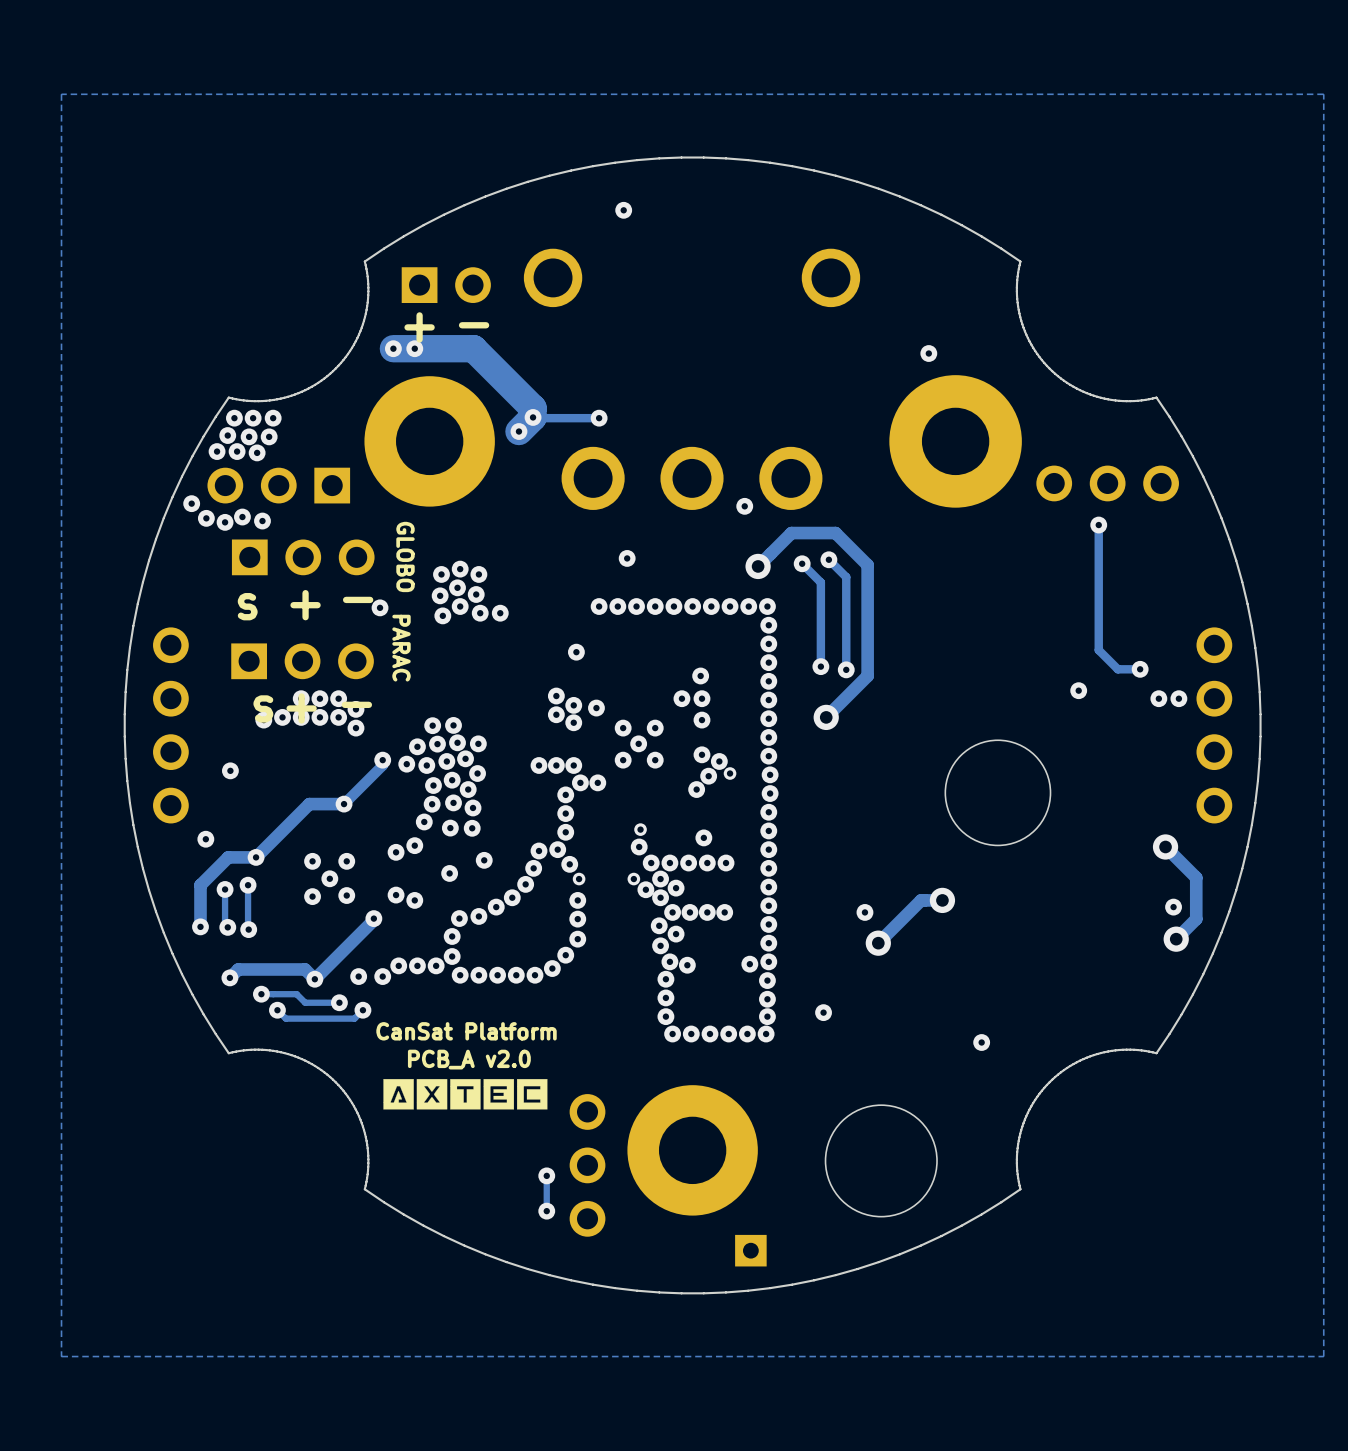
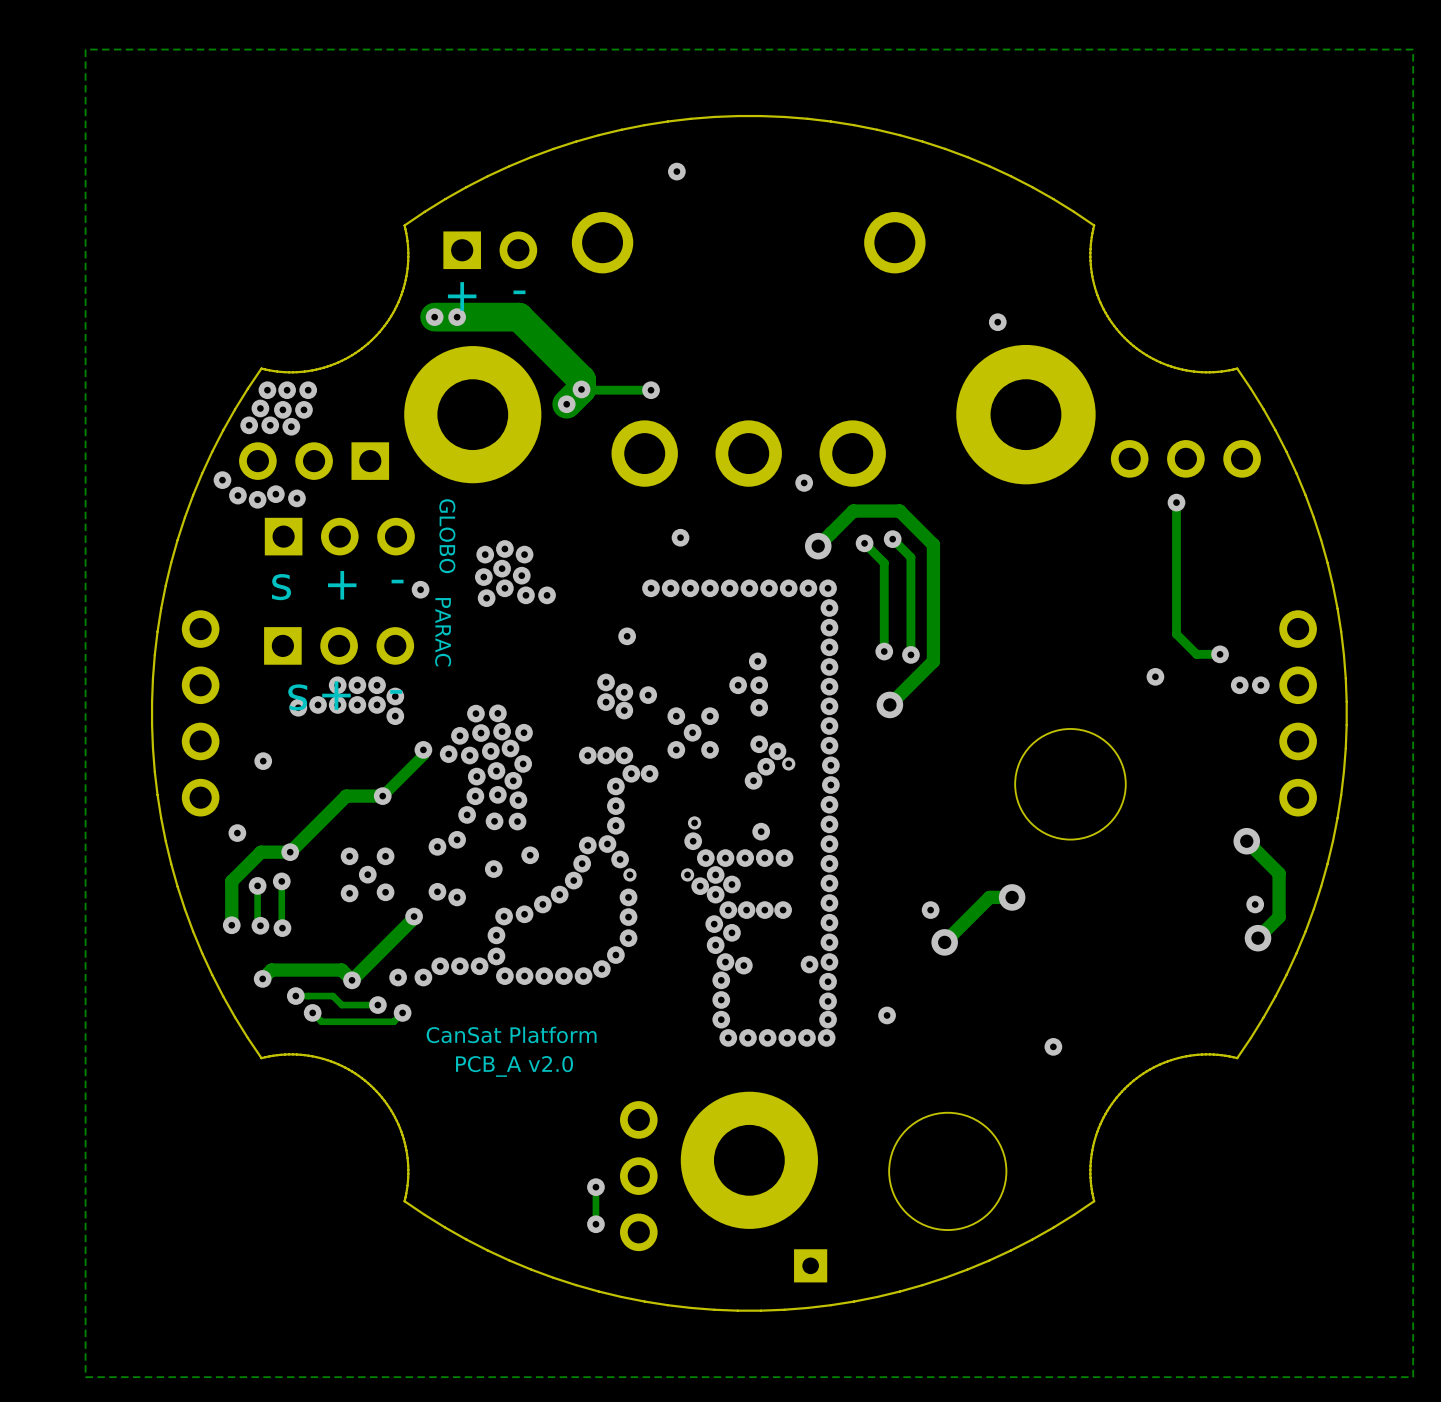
drawing: [383, 1079, 548, 1110] -> none

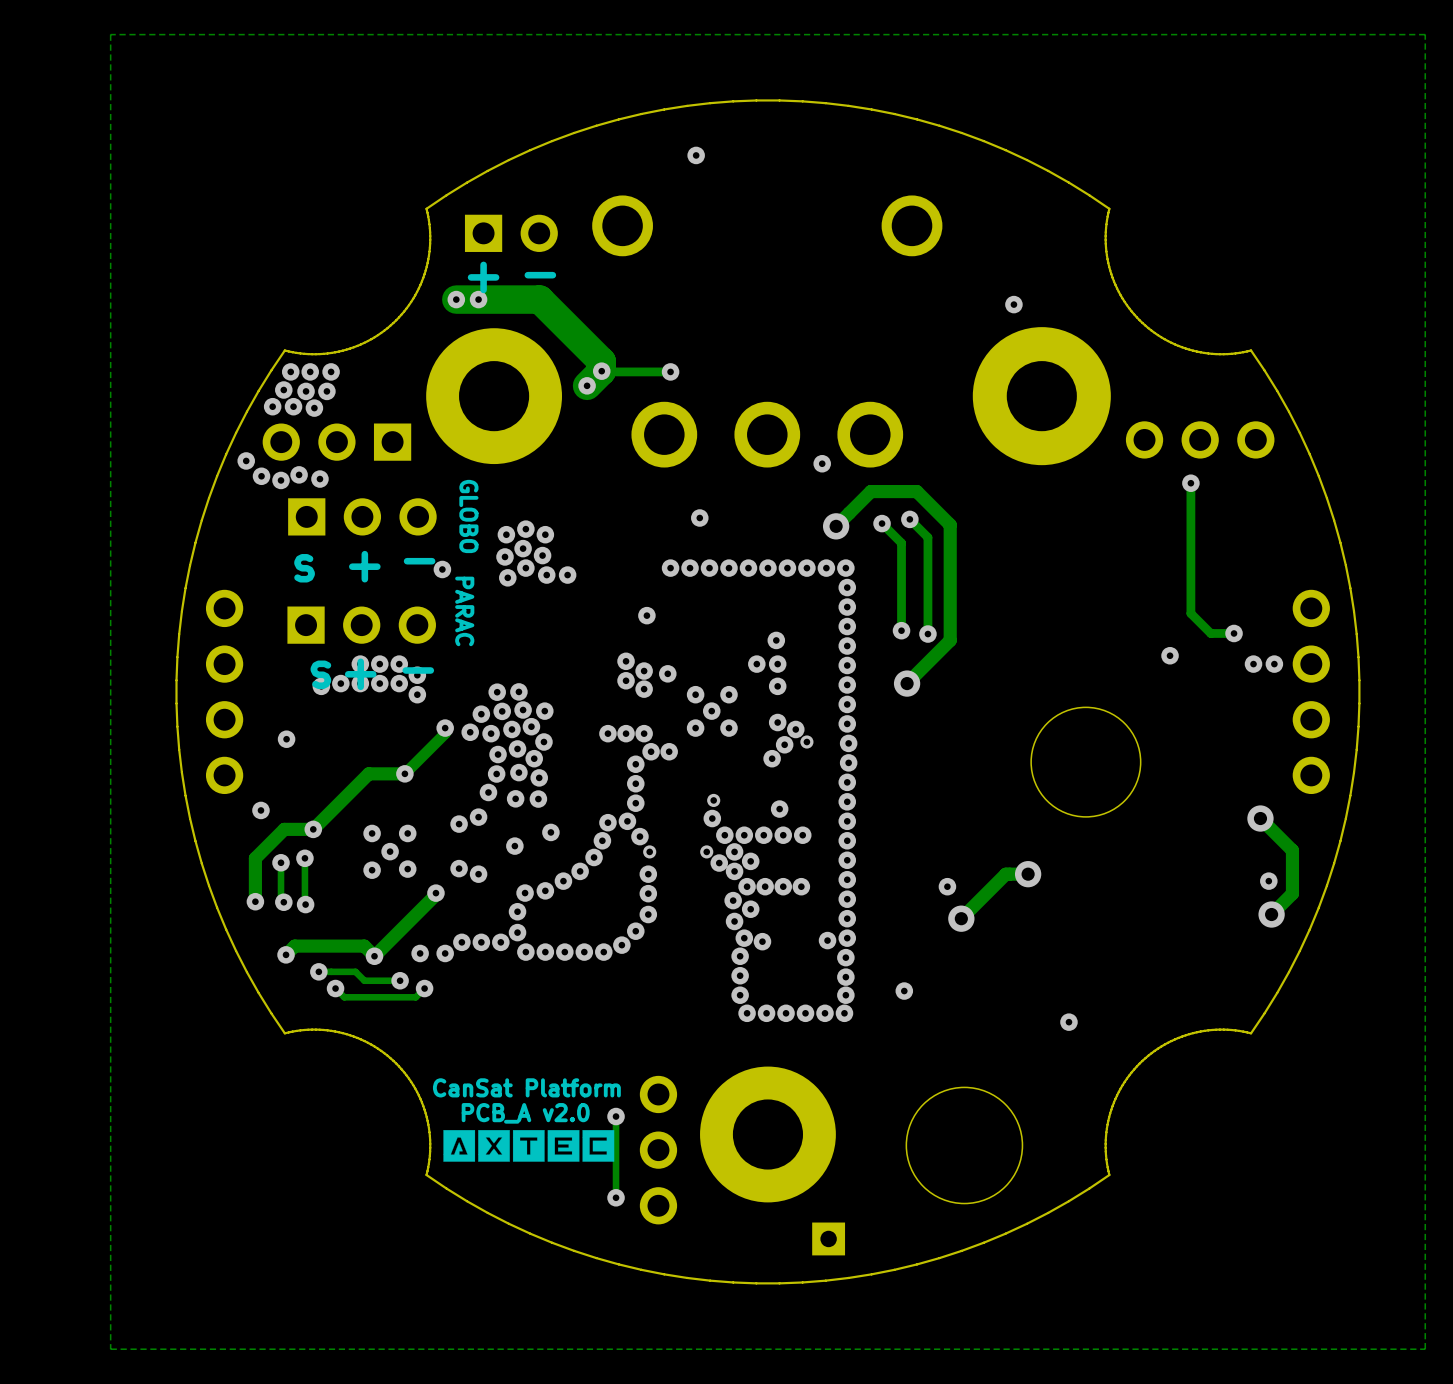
text position: CanSat Platform (511, 1034) -> CanSat Platform (526, 1087)
text position: PCB_A v2.0 (514, 1066) -> PCB_A v2.0 (525, 1113)
track: none -> (616, 1116) (616, 1161)
drawing: none -> [443, 1130, 615, 1162]
via position: (595, 1187) -> (616, 1116)

